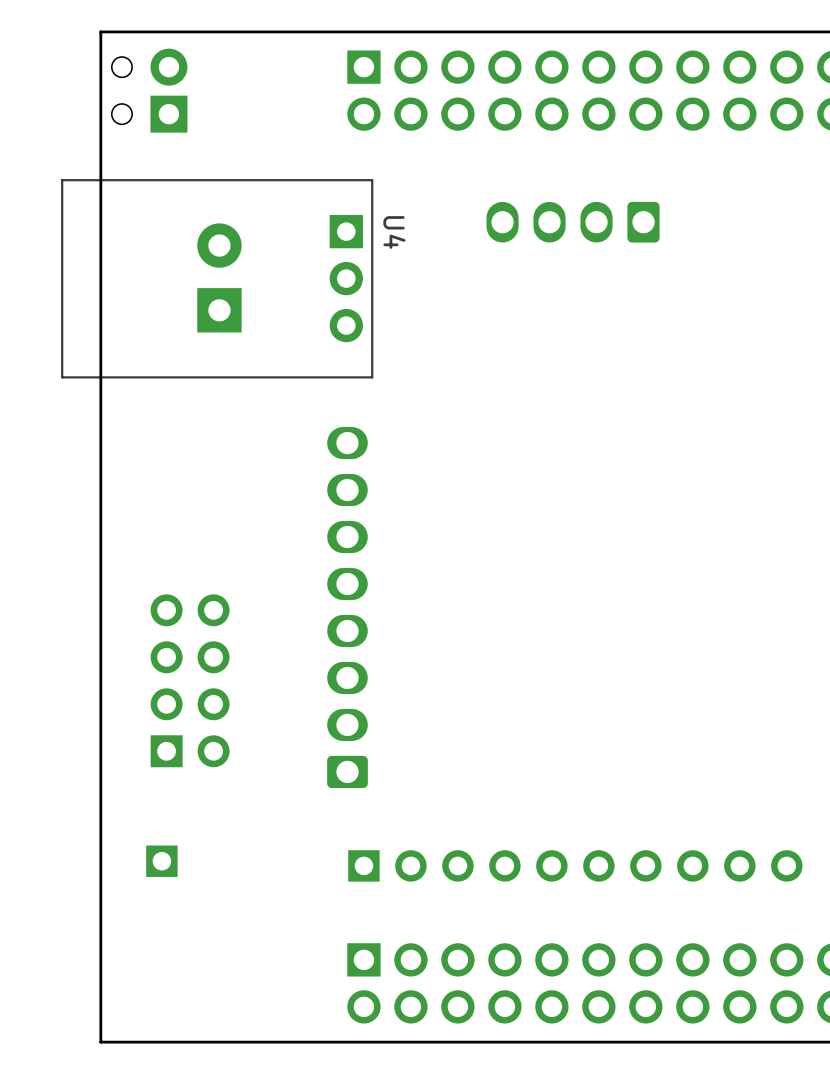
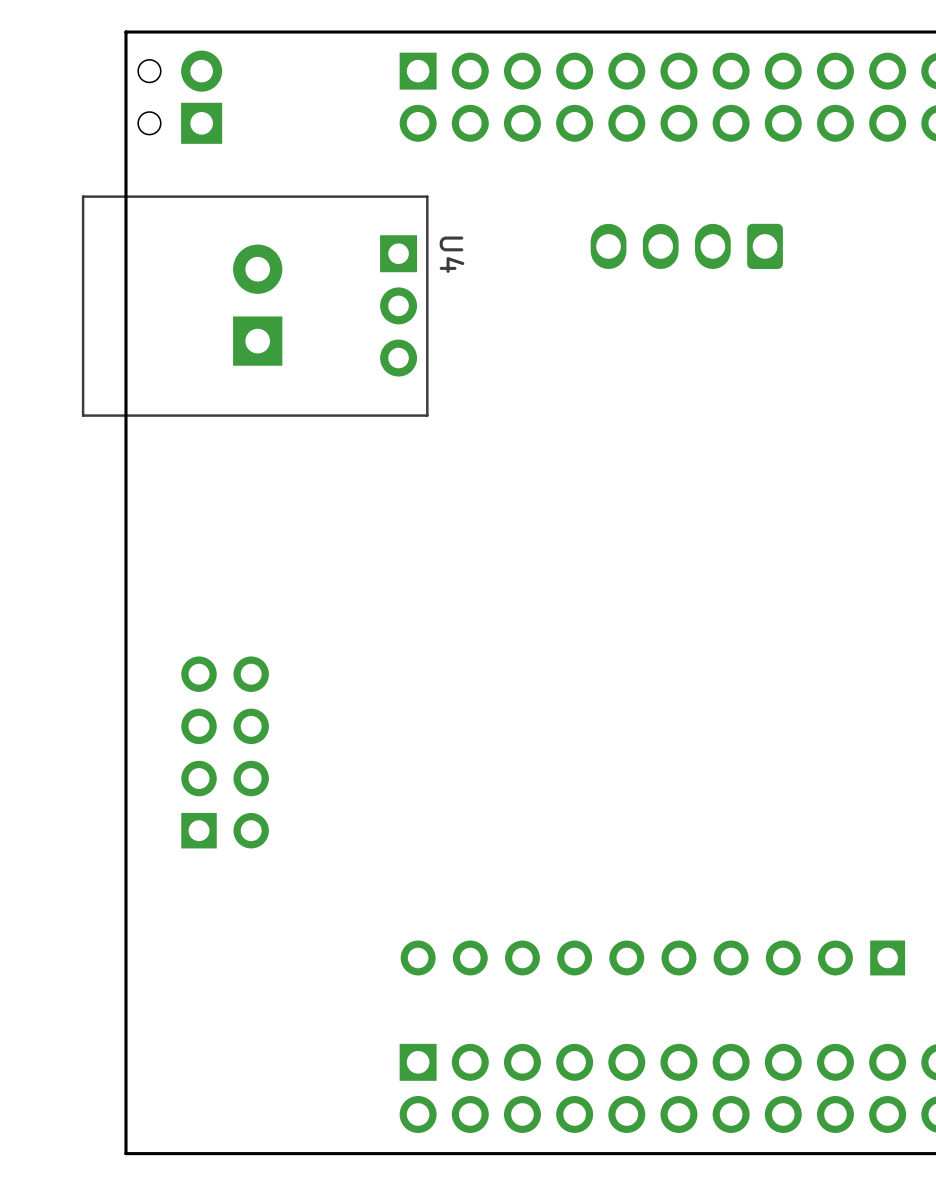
part position: (573, 222) -> (686, 246)
part: (347, 607) -> none
part: (161, 861) -> none
part rotation: 0° (575, 865) -> 180° (652, 957)

